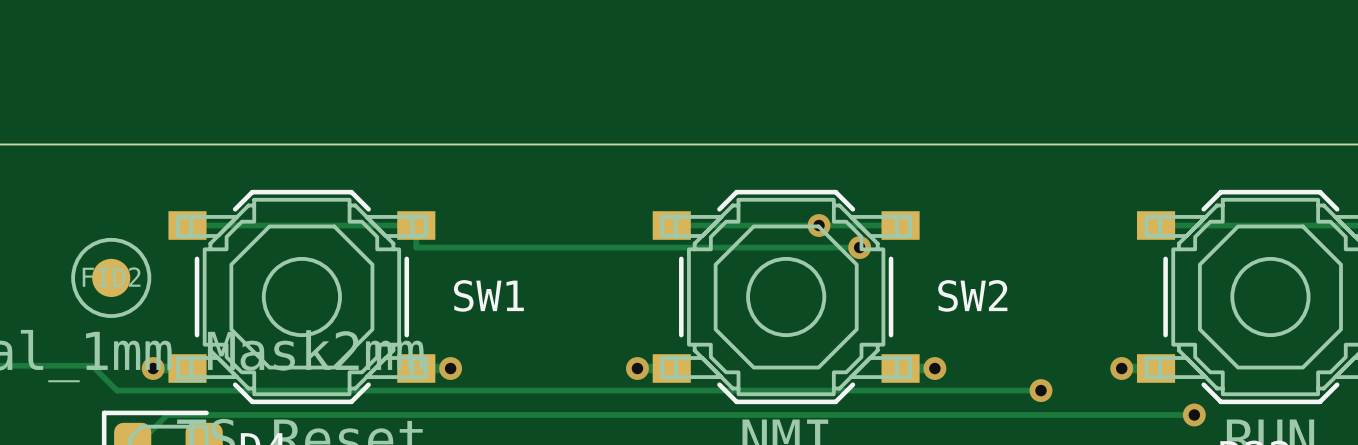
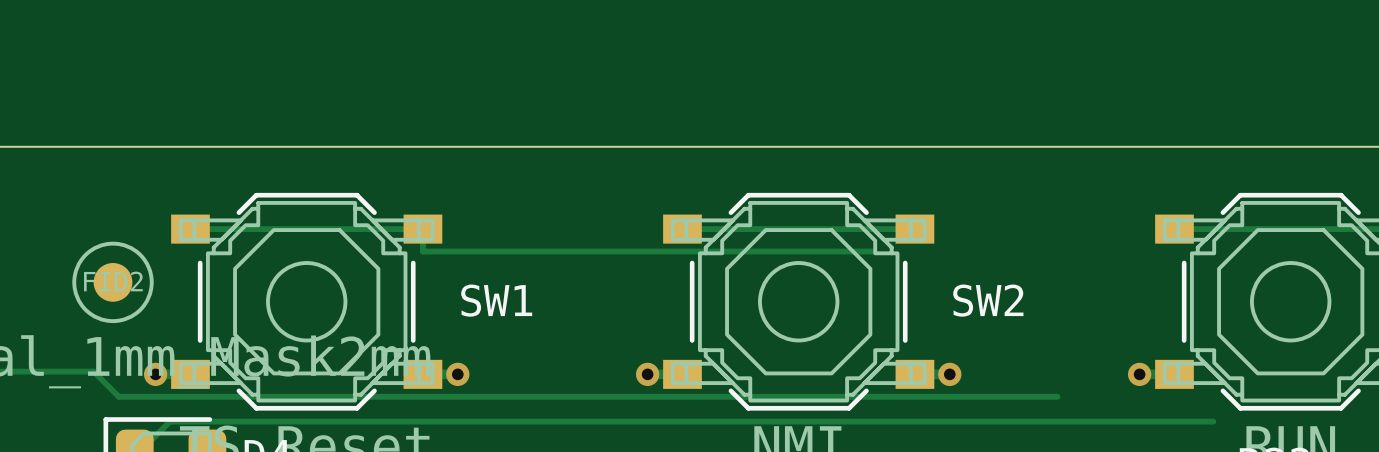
via: (819, 225) -> none
via: (859, 247) -> none
via: (1040, 390) -> none
via: (1194, 414) -> none

